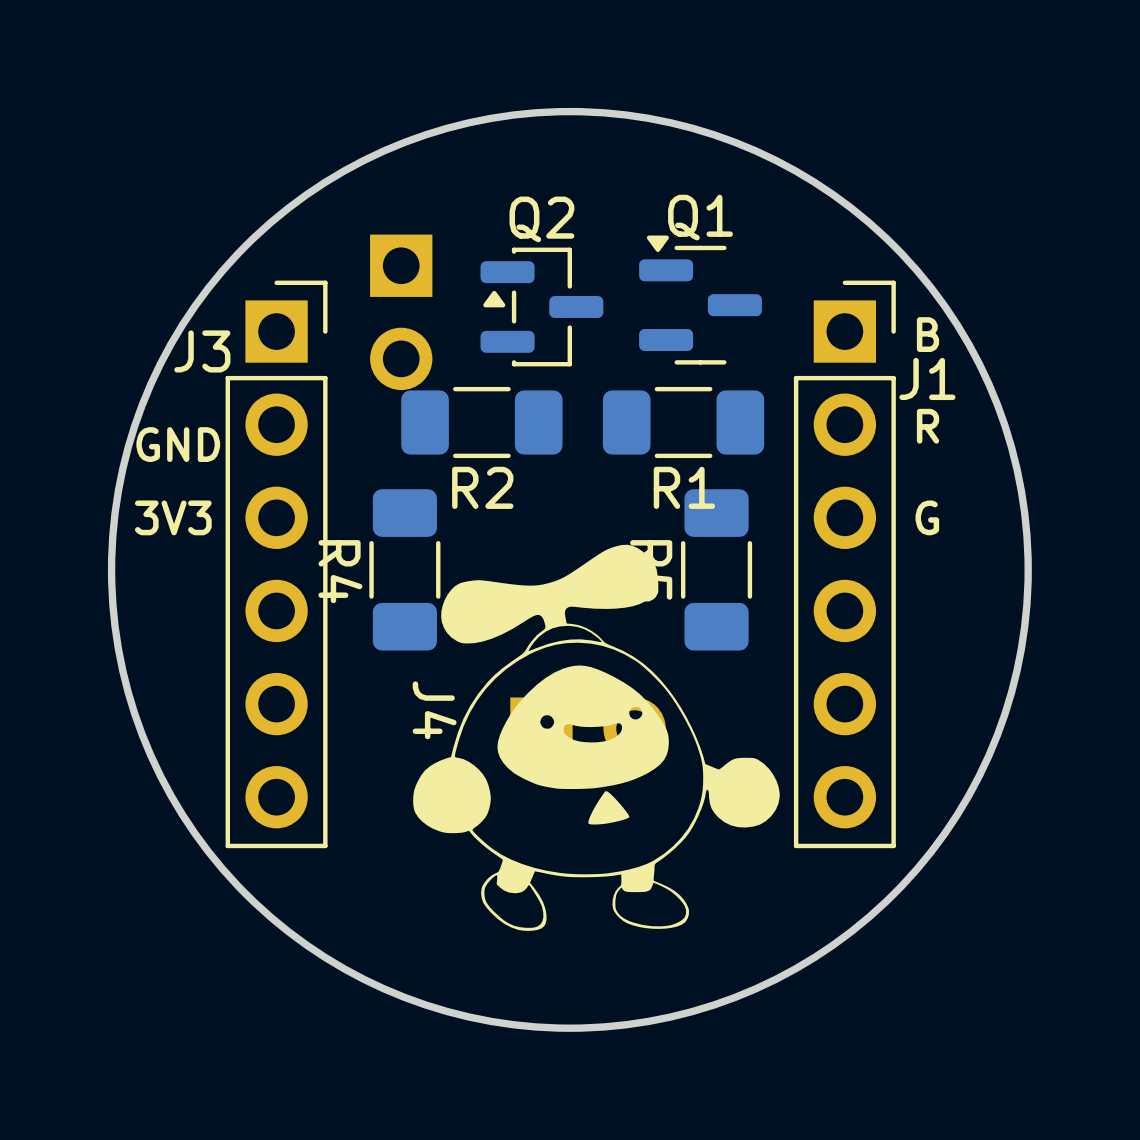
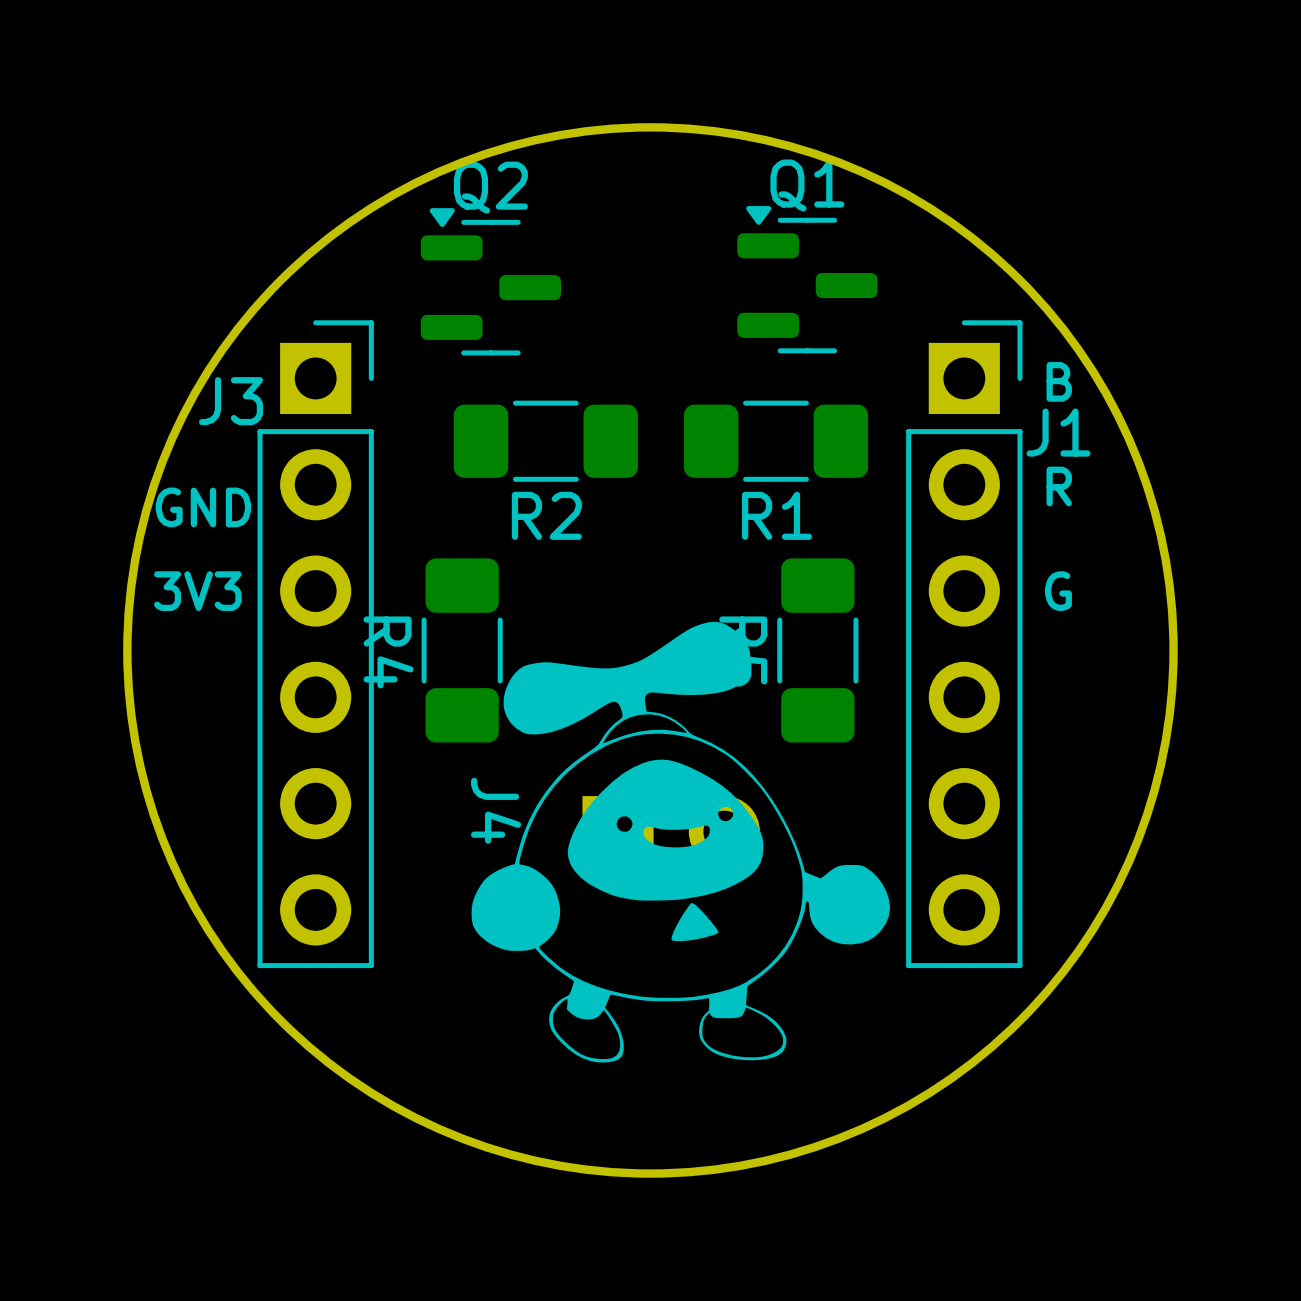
Q2 footprint: [480, 247, 604, 367] -> [420, 208, 562, 356]
Q1 position: (700, 300) -> (807, 279)
part: (401, 312) -> none
R2 position: (481, 422) -> (545, 441)
R1 position: (683, 422) -> (776, 441)

